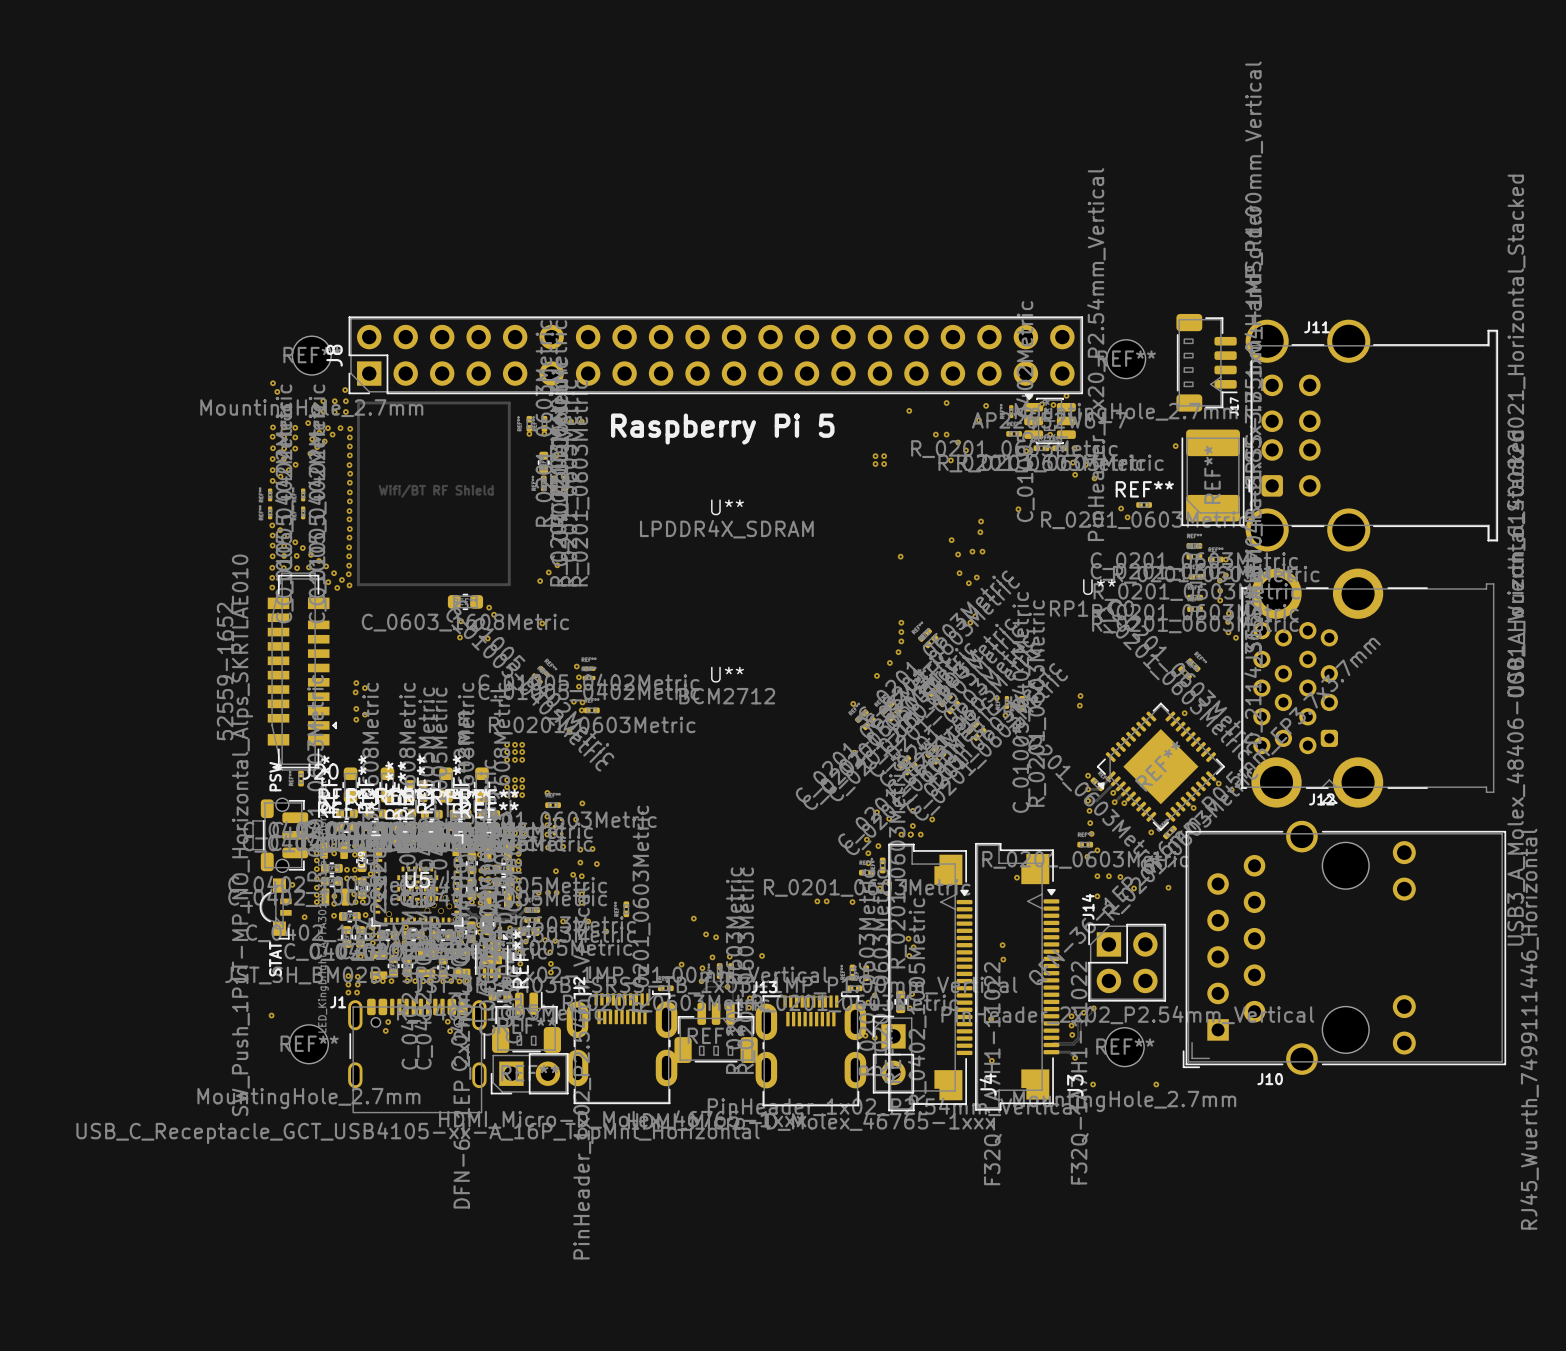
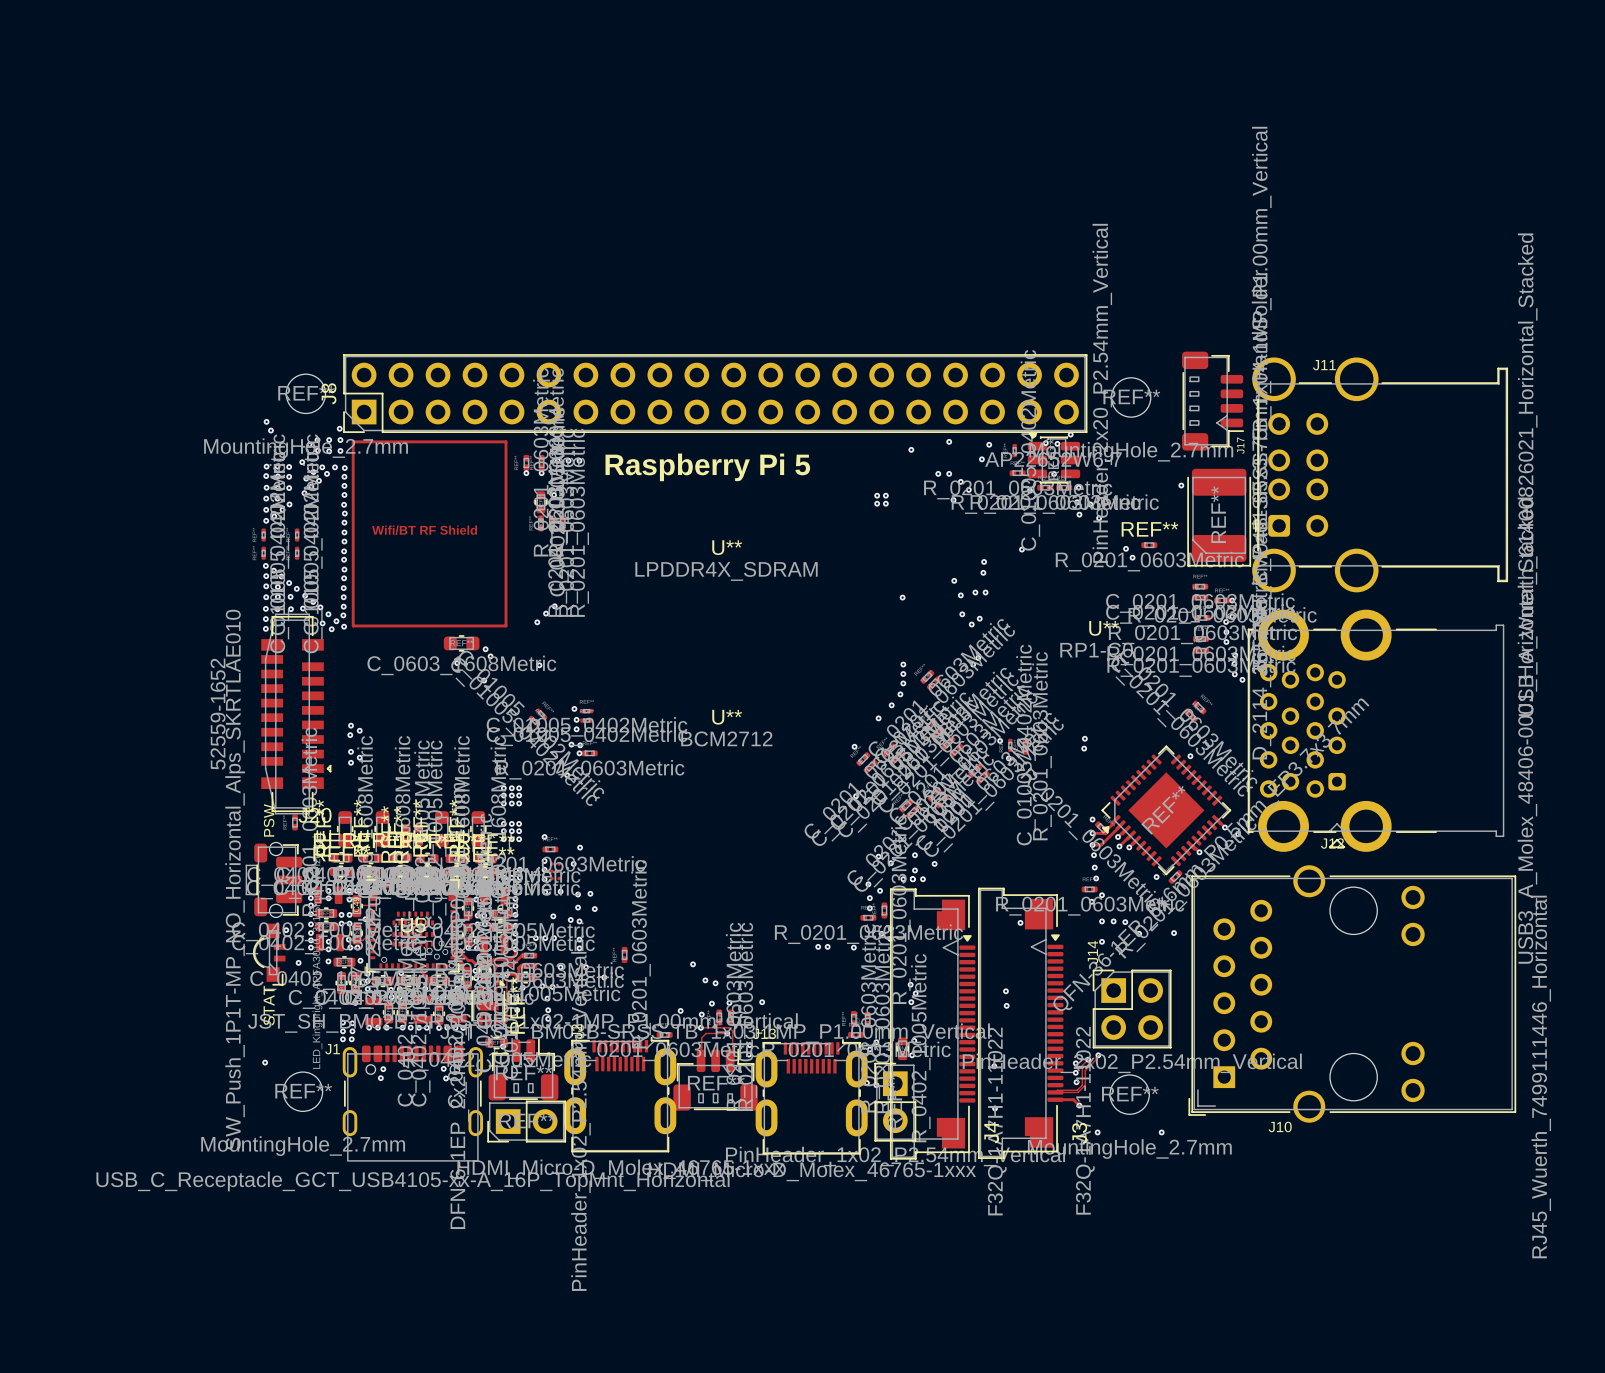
via: (460, 637) -> none

